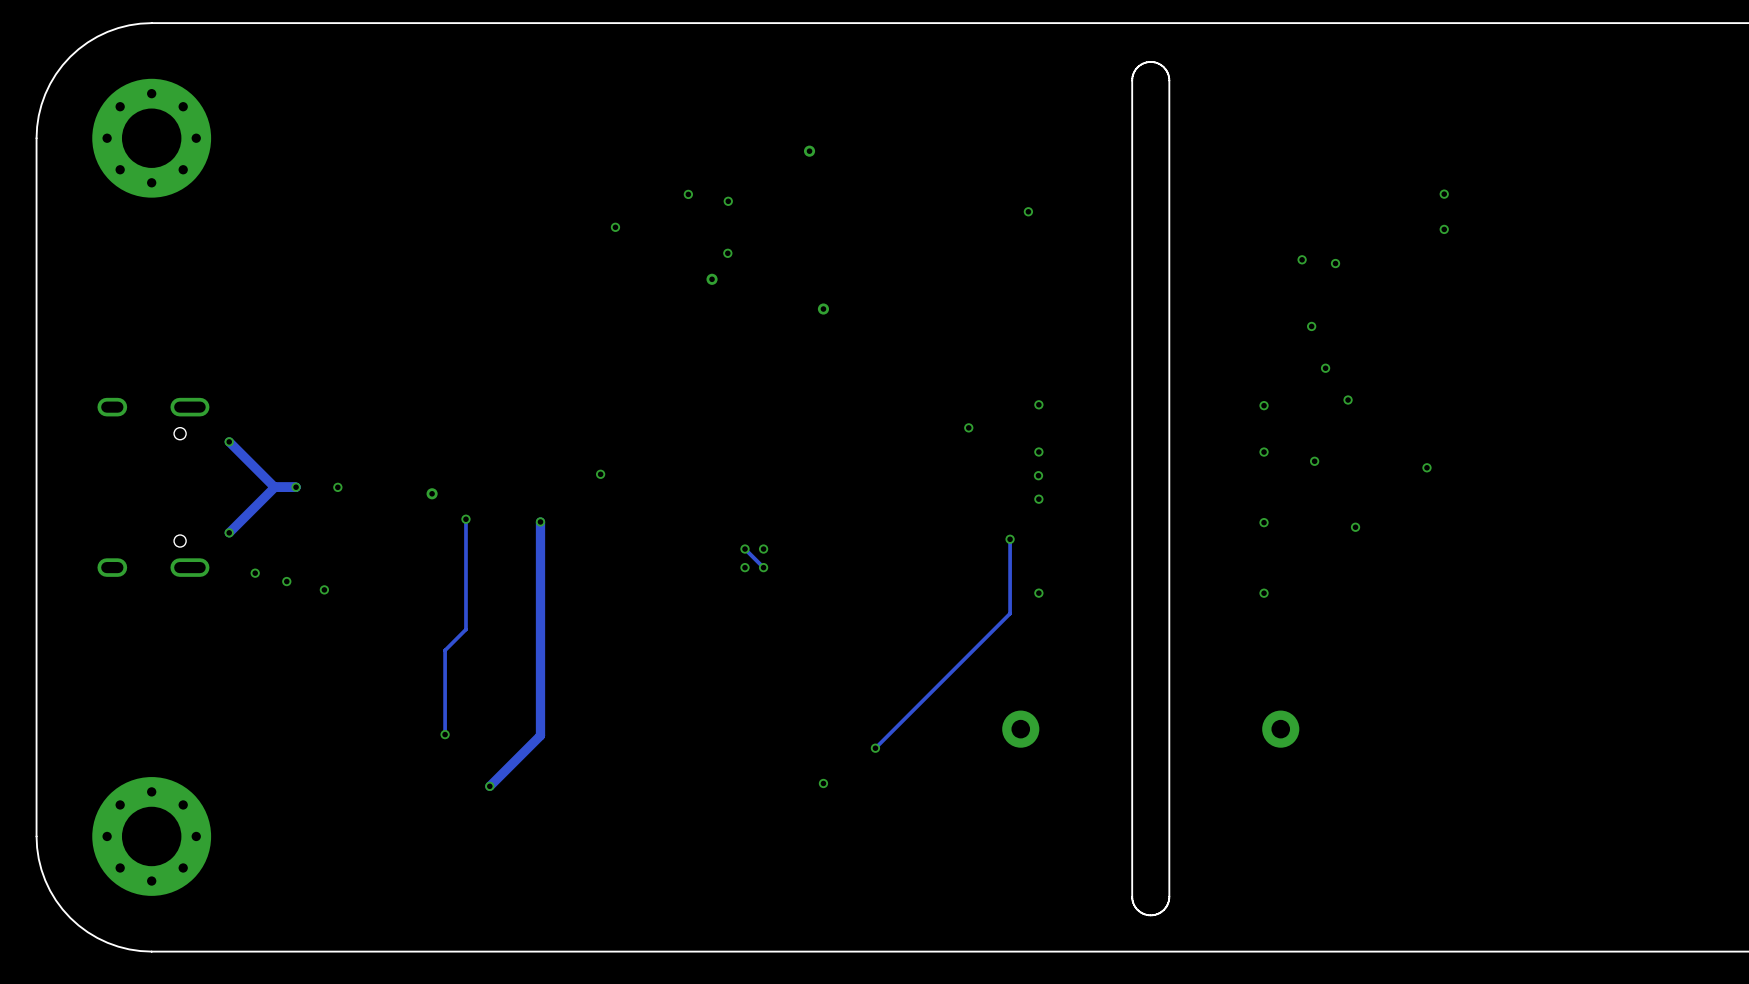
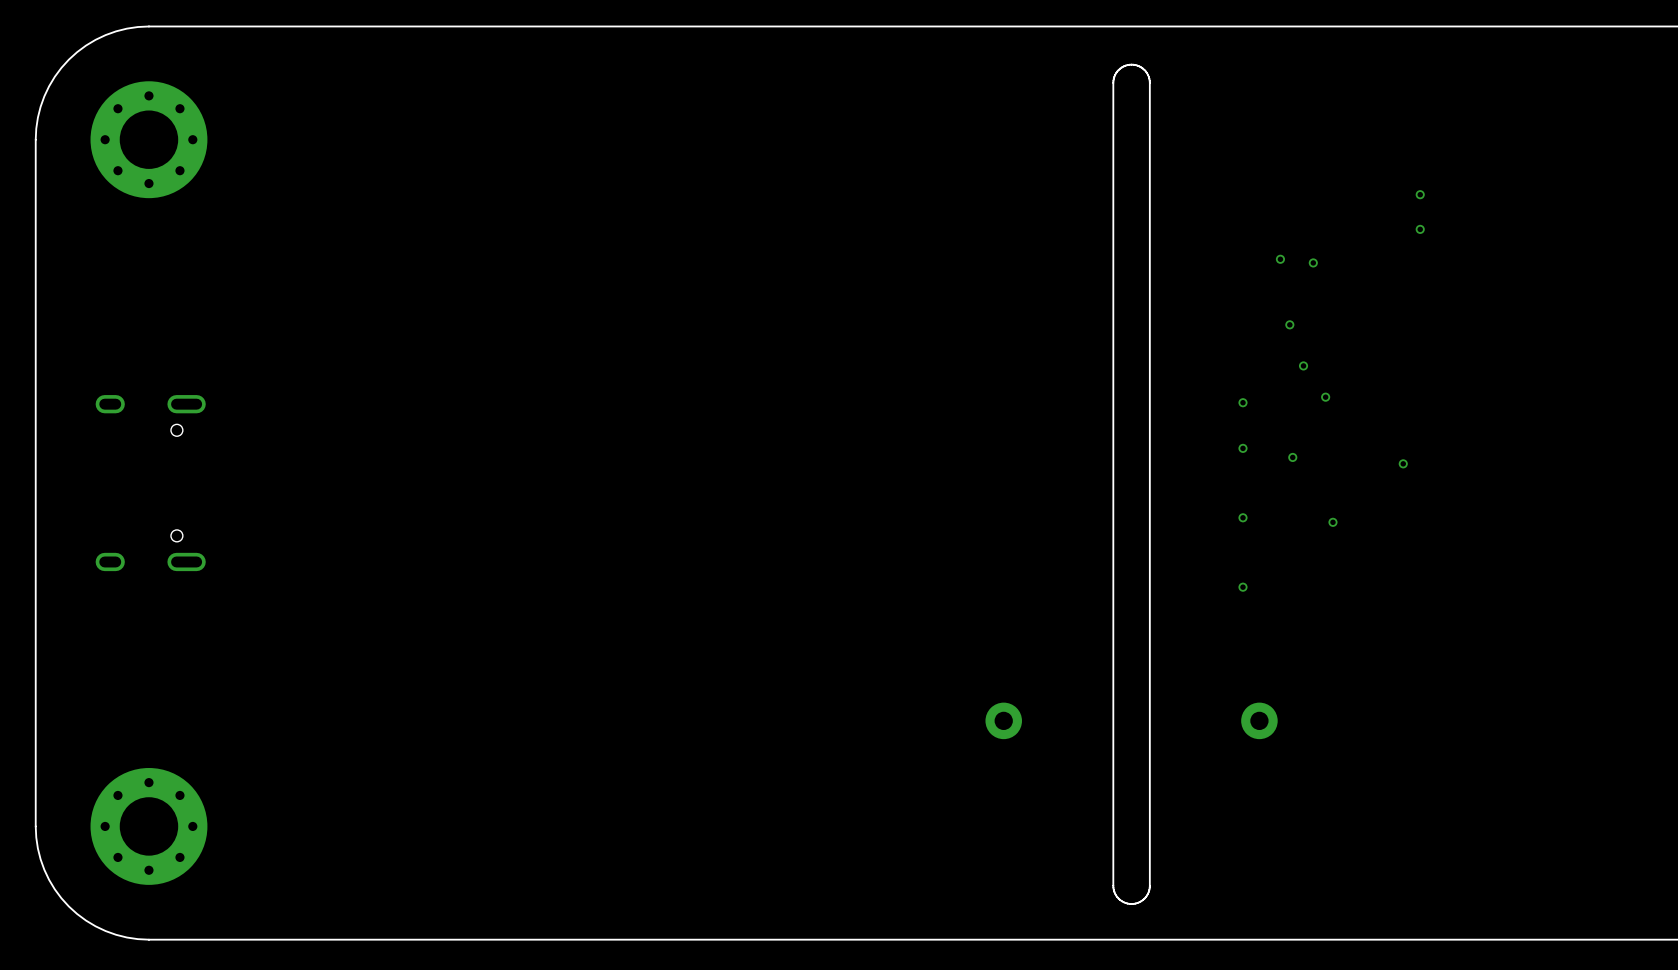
via: (809, 151) -> none
via: (688, 194) -> none
via: (728, 201) -> none
via: (1028, 211) -> none
via: (615, 227) -> none
via: (727, 253) -> none
via: (712, 279) -> none
via: (823, 309) -> none
via: (1038, 404) -> none
via: (968, 427) -> none
track: (229, 441) (274, 487) (296, 487) -> none
via: (229, 441) -> none
via: (1038, 452) -> none
via: (600, 474) -> none
via: (1038, 475) -> none
track: (274, 487) (229, 532) -> none
via: (296, 487) -> none
via: (337, 487) -> none
via: (432, 493) -> none
via: (1038, 499) -> none
track: (465, 519) (465, 629) (445, 650) (445, 734) -> none
via: (465, 519) -> none
track: (540, 521) (540, 735) (489, 786) -> none
via: (540, 521) -> none
via: (229, 532) -> none
track: (1010, 539) (1010, 613) (875, 748) -> none
via: (1010, 539) -> none
track: (745, 549) (763, 567) -> none
via: (745, 549) -> none
via: (763, 549) -> none
via: (745, 567) -> none
via: (763, 567) -> none
via: (255, 573) -> none
via: (286, 581) -> none
via: (324, 589) -> none
via: (1038, 593) -> none
via: (445, 734) -> none
via: (875, 748) -> none
via: (823, 783) -> none
via: (489, 786) -> none

